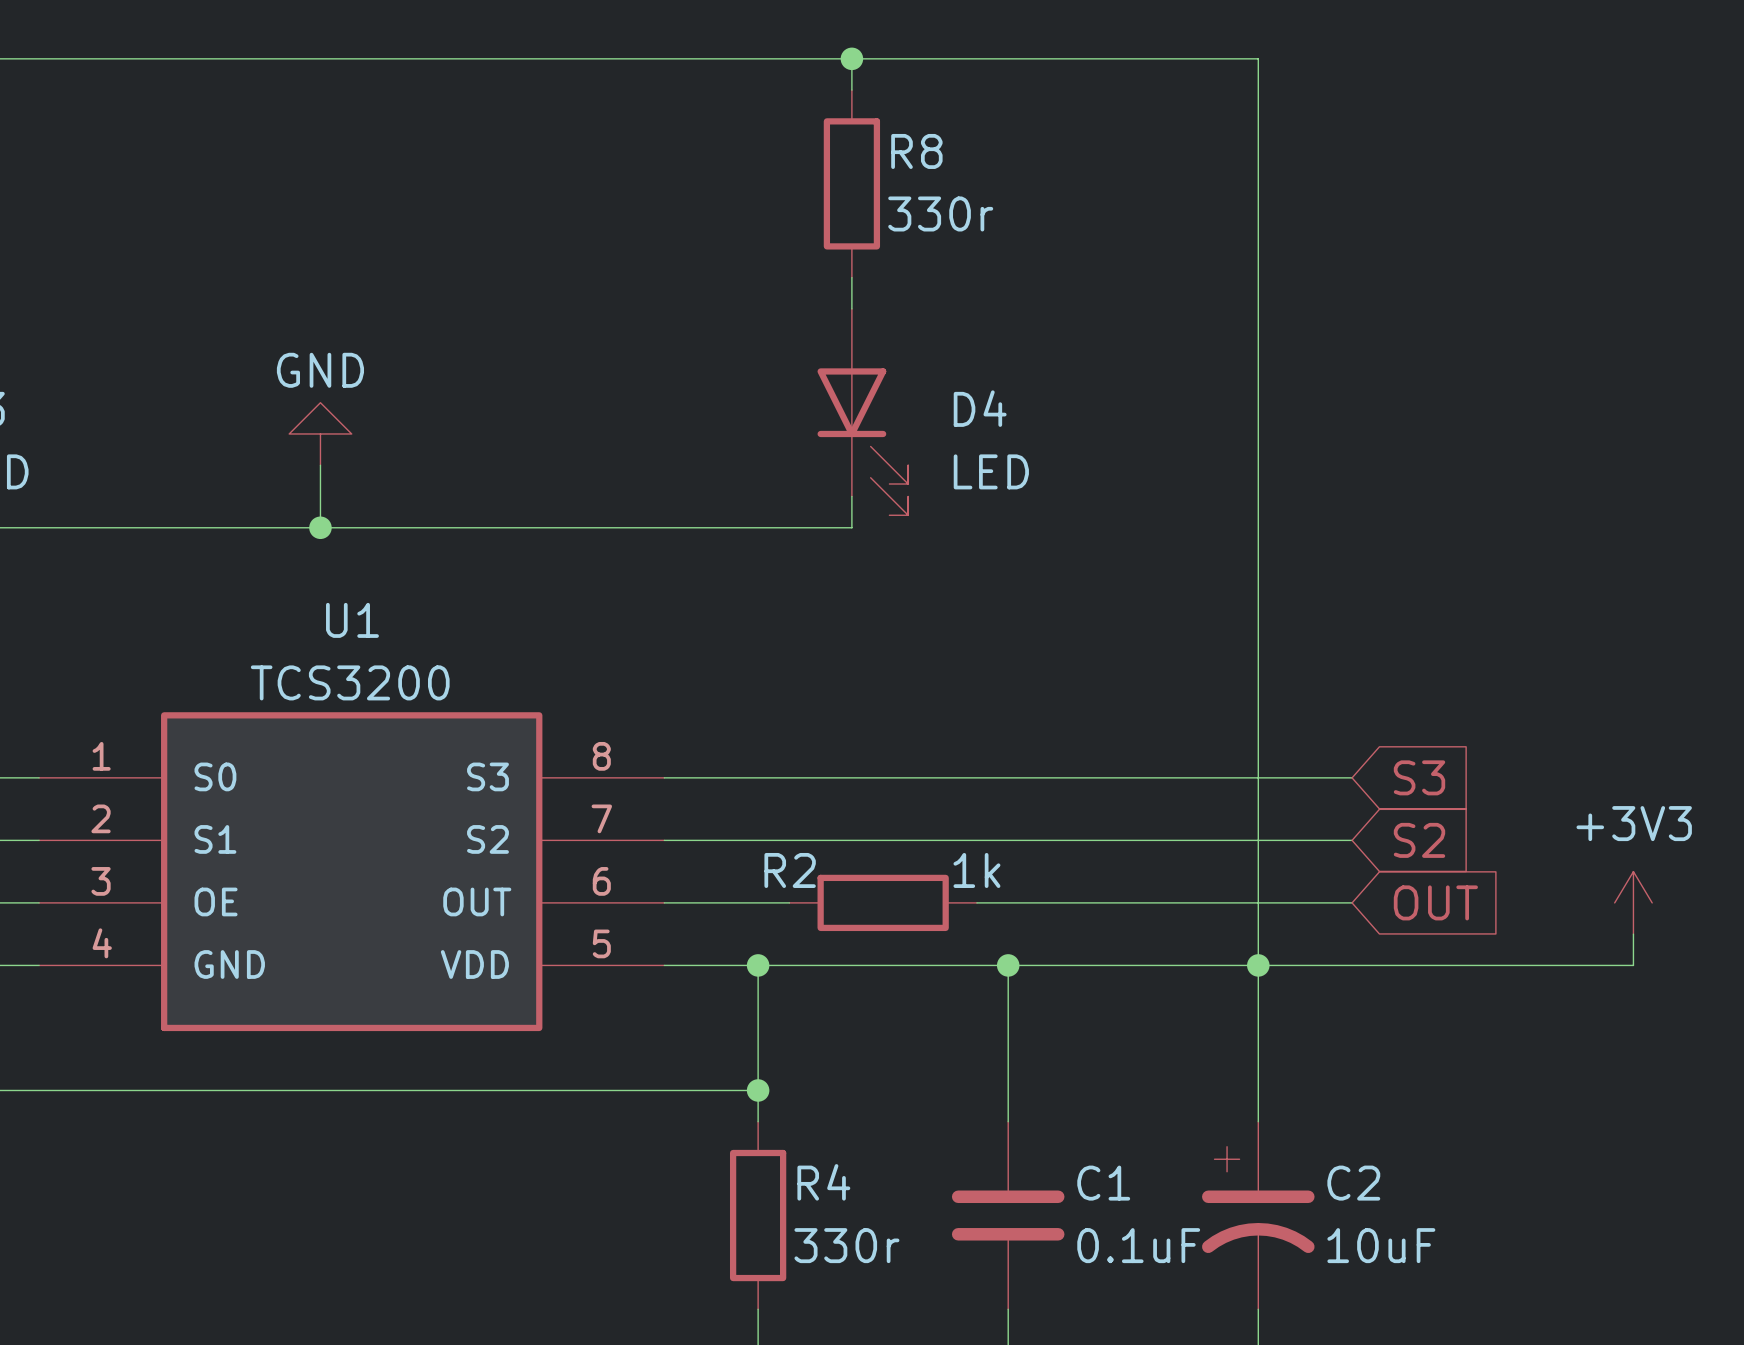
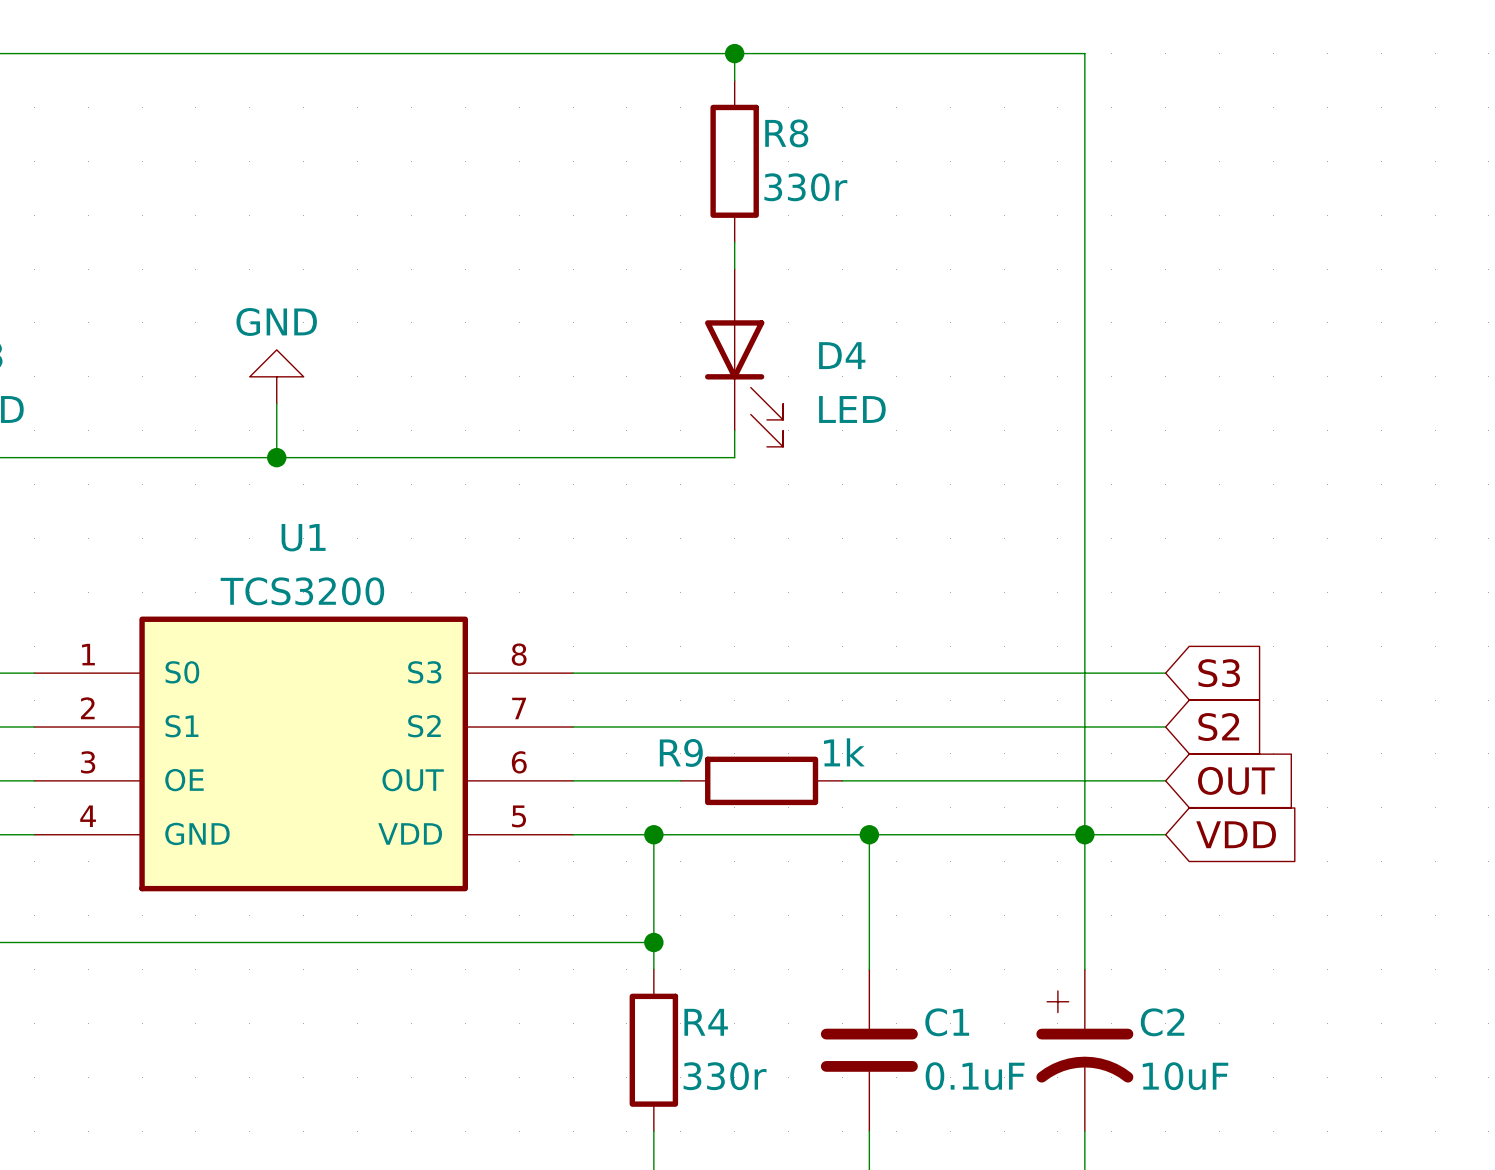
R2 name: R2 (790, 870) -> R9 (681, 752)
power symbol: +3V3 (1633, 902) -> none
wire: (1633, 934) (1633, 965) (1352, 965) -> none
global label: none -> VDD (1236, 834)

